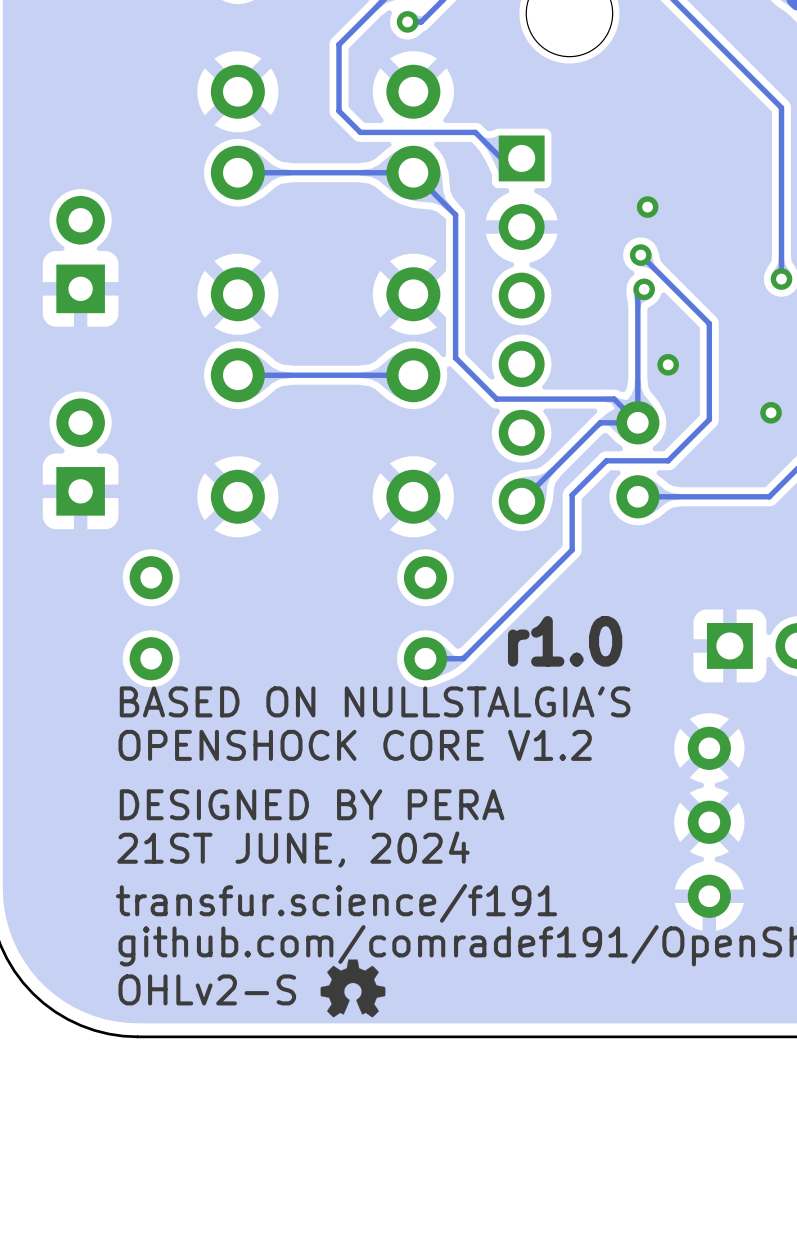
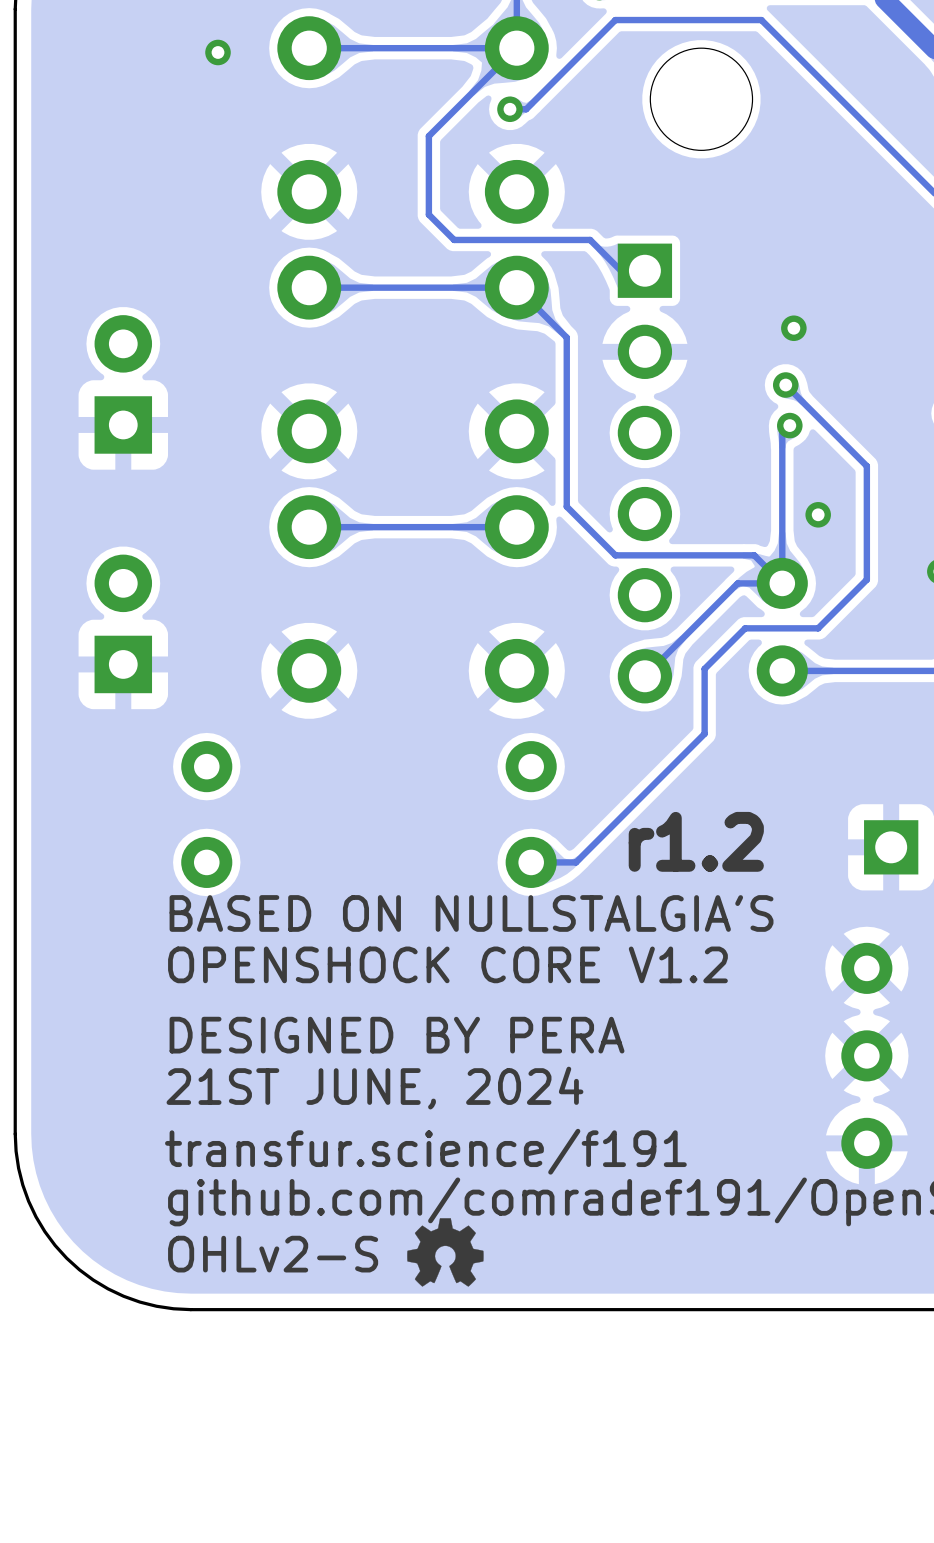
text: r1.0 (565, 641) -> r1.2 (696, 841)

